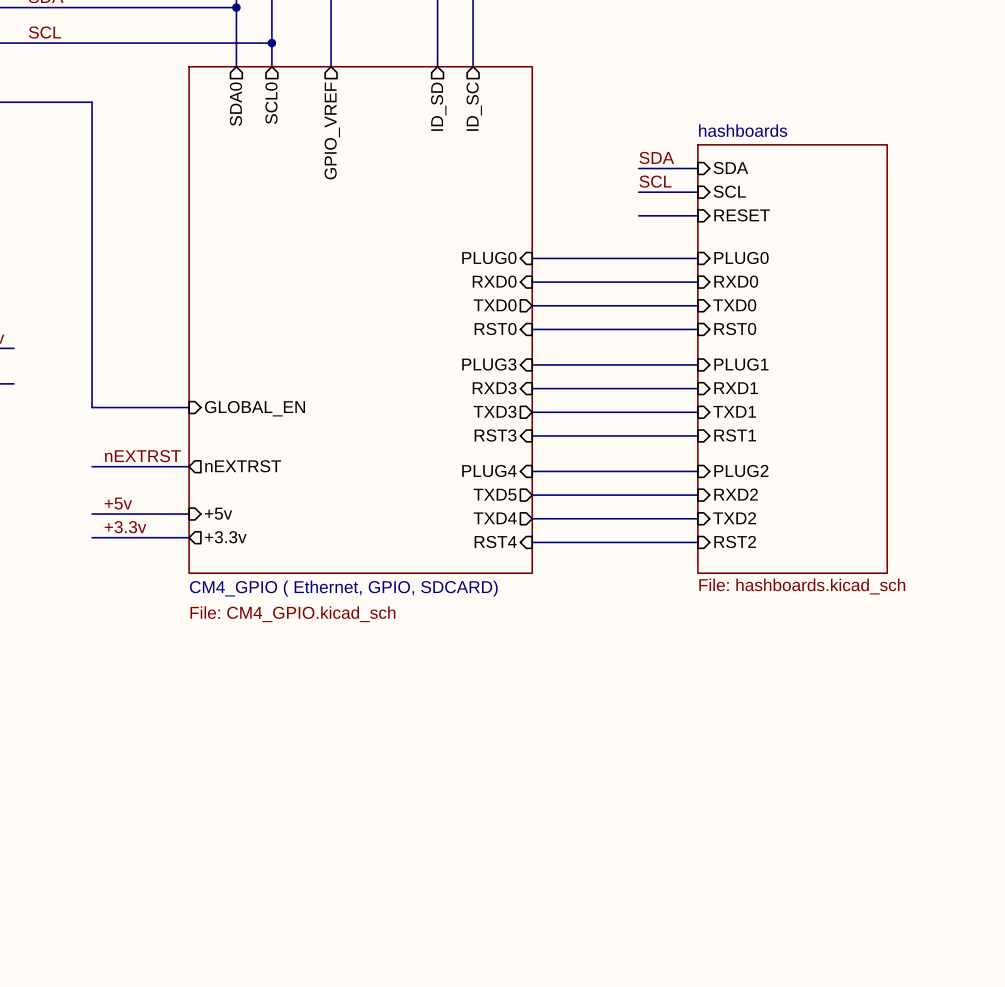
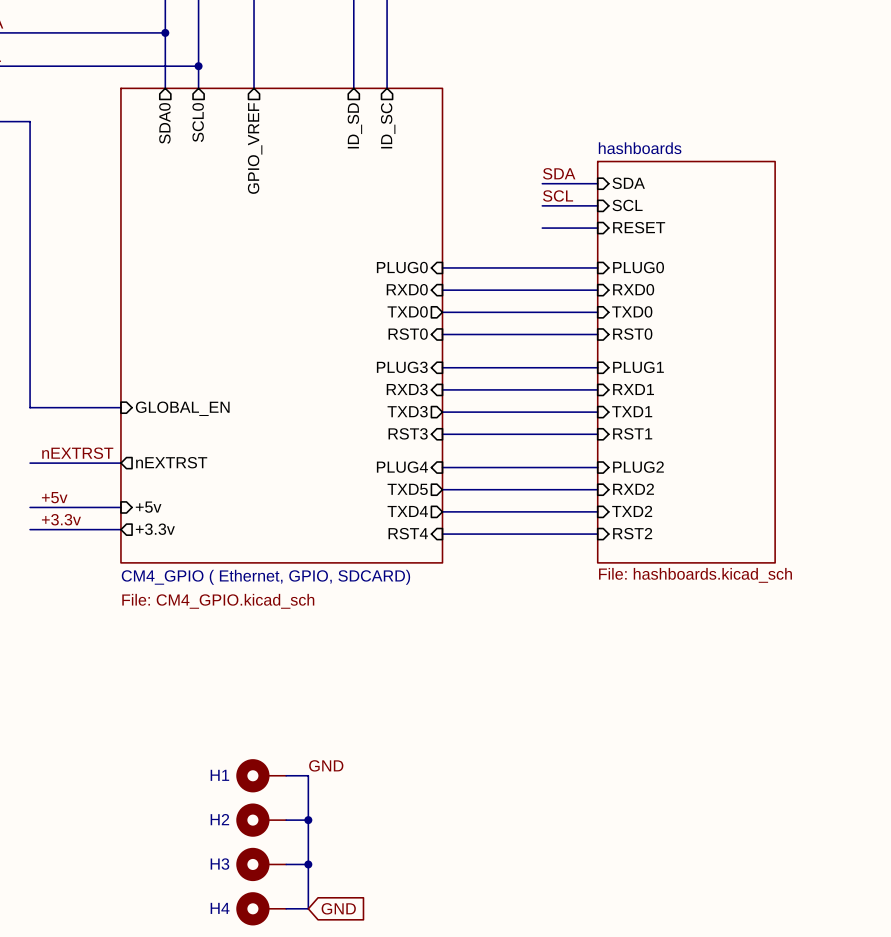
label: none -> GND (326, 765)
H1: none -> (261, 775)
wire: none -> (286, 775) (308, 775) (308, 908) (286, 908)
H2: none -> (261, 820)
wire: none -> (286, 820) (308, 820)
junction: none -> (308, 820)
H3: none -> (261, 864)
wire: none -> (286, 864) (308, 864)
junction: none -> (308, 864)
H4: none -> (261, 908)
global label: none -> GND (338, 908)

